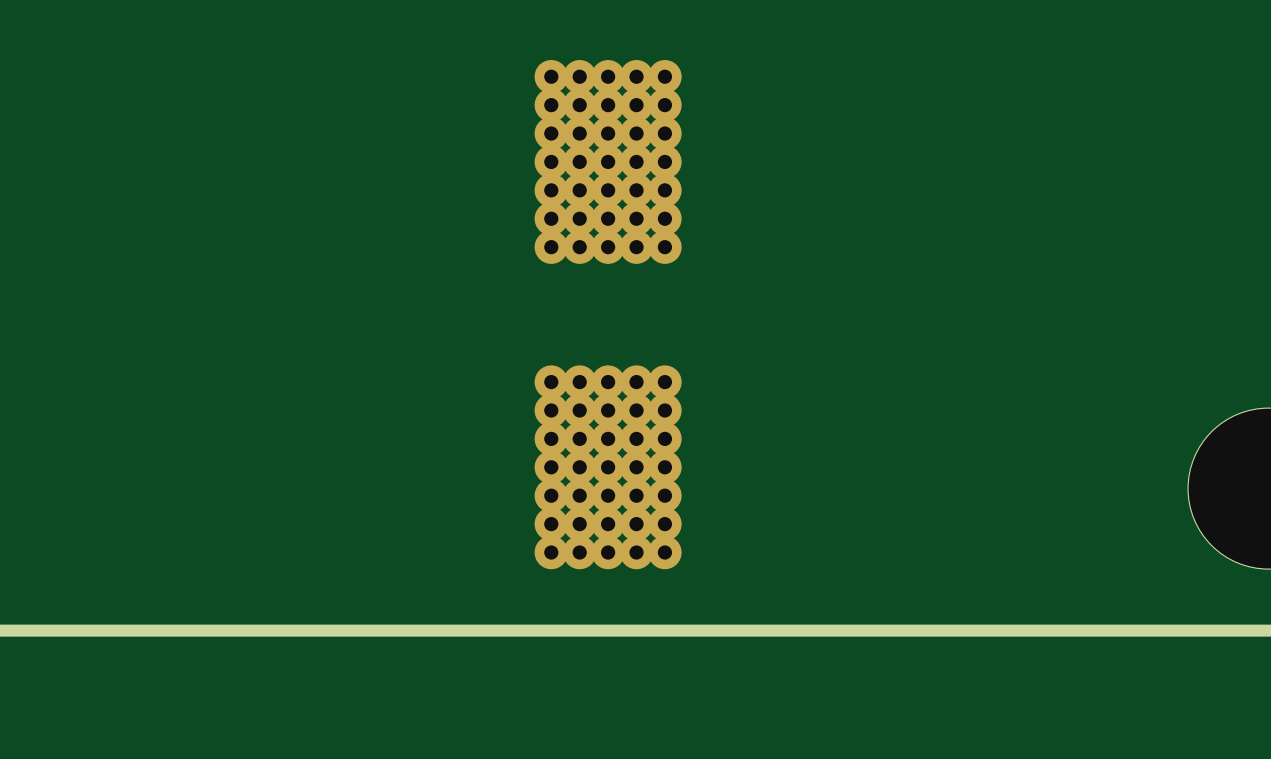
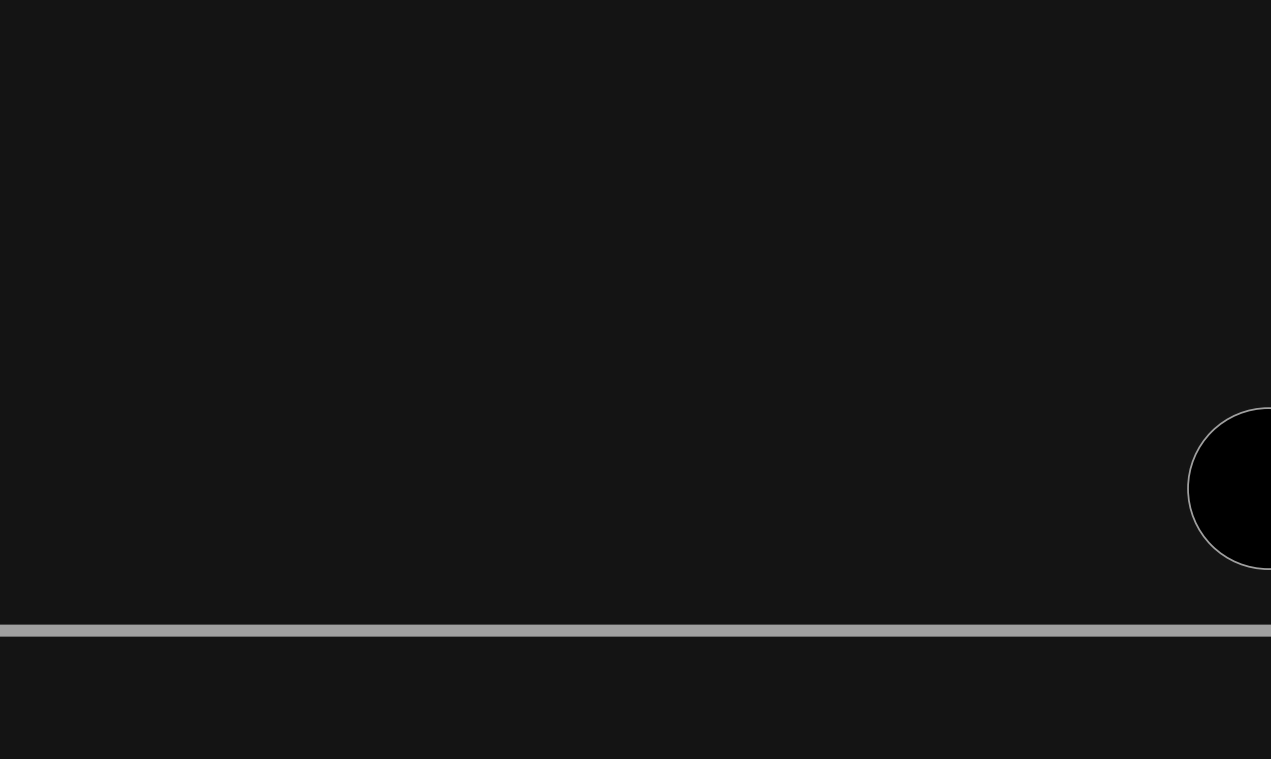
via: (551, 76) -> none
via: (579, 76) -> none
via: (608, 76) -> none
via: (636, 76) -> none
via: (664, 76) -> none
via: (551, 105) -> none
via: (579, 105) -> none
via: (608, 105) -> none
via: (636, 105) -> none
via: (664, 105) -> none
via: (551, 133) -> none
via: (579, 133) -> none
via: (608, 133) -> none
via: (636, 133) -> none
via: (664, 133) -> none
via: (551, 161) -> none
via: (579, 161) -> none
via: (608, 161) -> none
via: (636, 161) -> none
via: (664, 161) -> none
via: (551, 190) -> none
via: (579, 190) -> none
via: (608, 190) -> none
via: (636, 190) -> none
via: (664, 190) -> none
via: (551, 218) -> none
via: (579, 218) -> none
via: (608, 218) -> none
via: (636, 218) -> none
via: (664, 218) -> none
via: (551, 247) -> none
via: (579, 247) -> none
via: (608, 247) -> none
via: (636, 247) -> none
via: (664, 247) -> none
via: (551, 382) -> none
via: (579, 382) -> none
via: (608, 382) -> none
via: (636, 382) -> none
via: (664, 382) -> none
via: (551, 410) -> none
via: (579, 410) -> none
via: (608, 410) -> none
via: (636, 410) -> none
via: (664, 410) -> none
via: (551, 438) -> none
via: (579, 438) -> none
via: (608, 438) -> none
via: (636, 438) -> none
via: (664, 438) -> none
via: (551, 467) -> none
via: (579, 467) -> none
via: (608, 467) -> none
via: (636, 467) -> none
via: (664, 467) -> none
via: (551, 495) -> none
via: (579, 495) -> none
via: (608, 495) -> none
via: (636, 495) -> none
via: (664, 495) -> none
via: (551, 524) -> none
via: (579, 524) -> none
via: (608, 524) -> none
via: (636, 524) -> none
via: (664, 524) -> none
via: (551, 552) -> none
via: (579, 552) -> none
via: (608, 552) -> none
via: (636, 552) -> none
via: (664, 552) -> none

